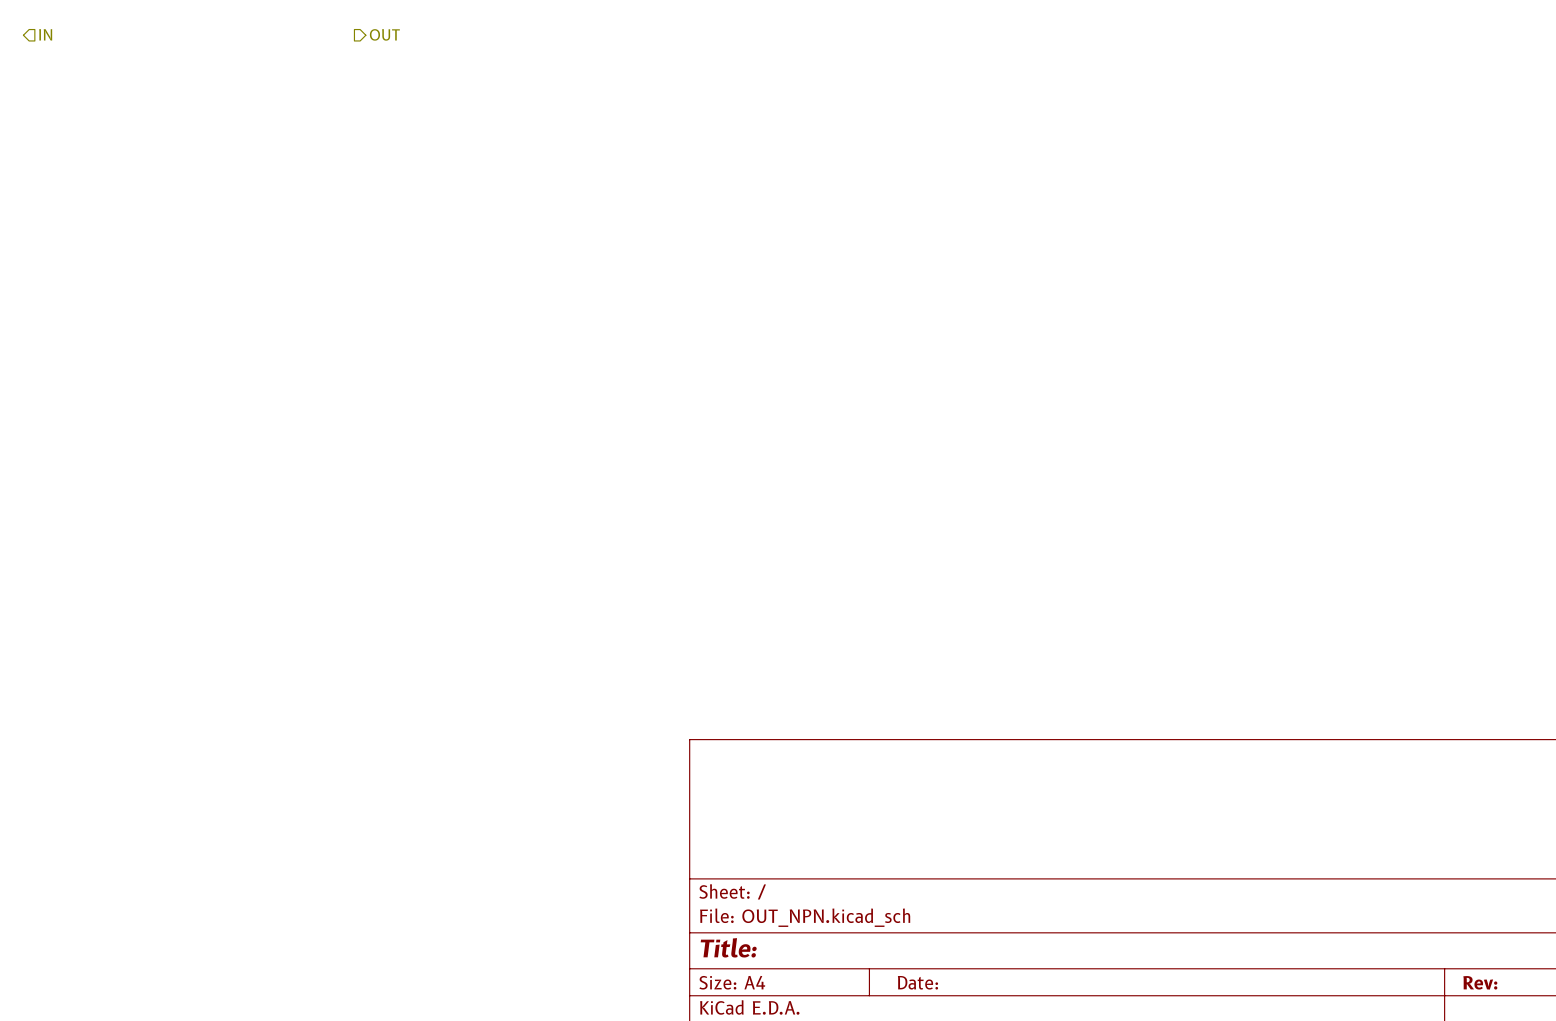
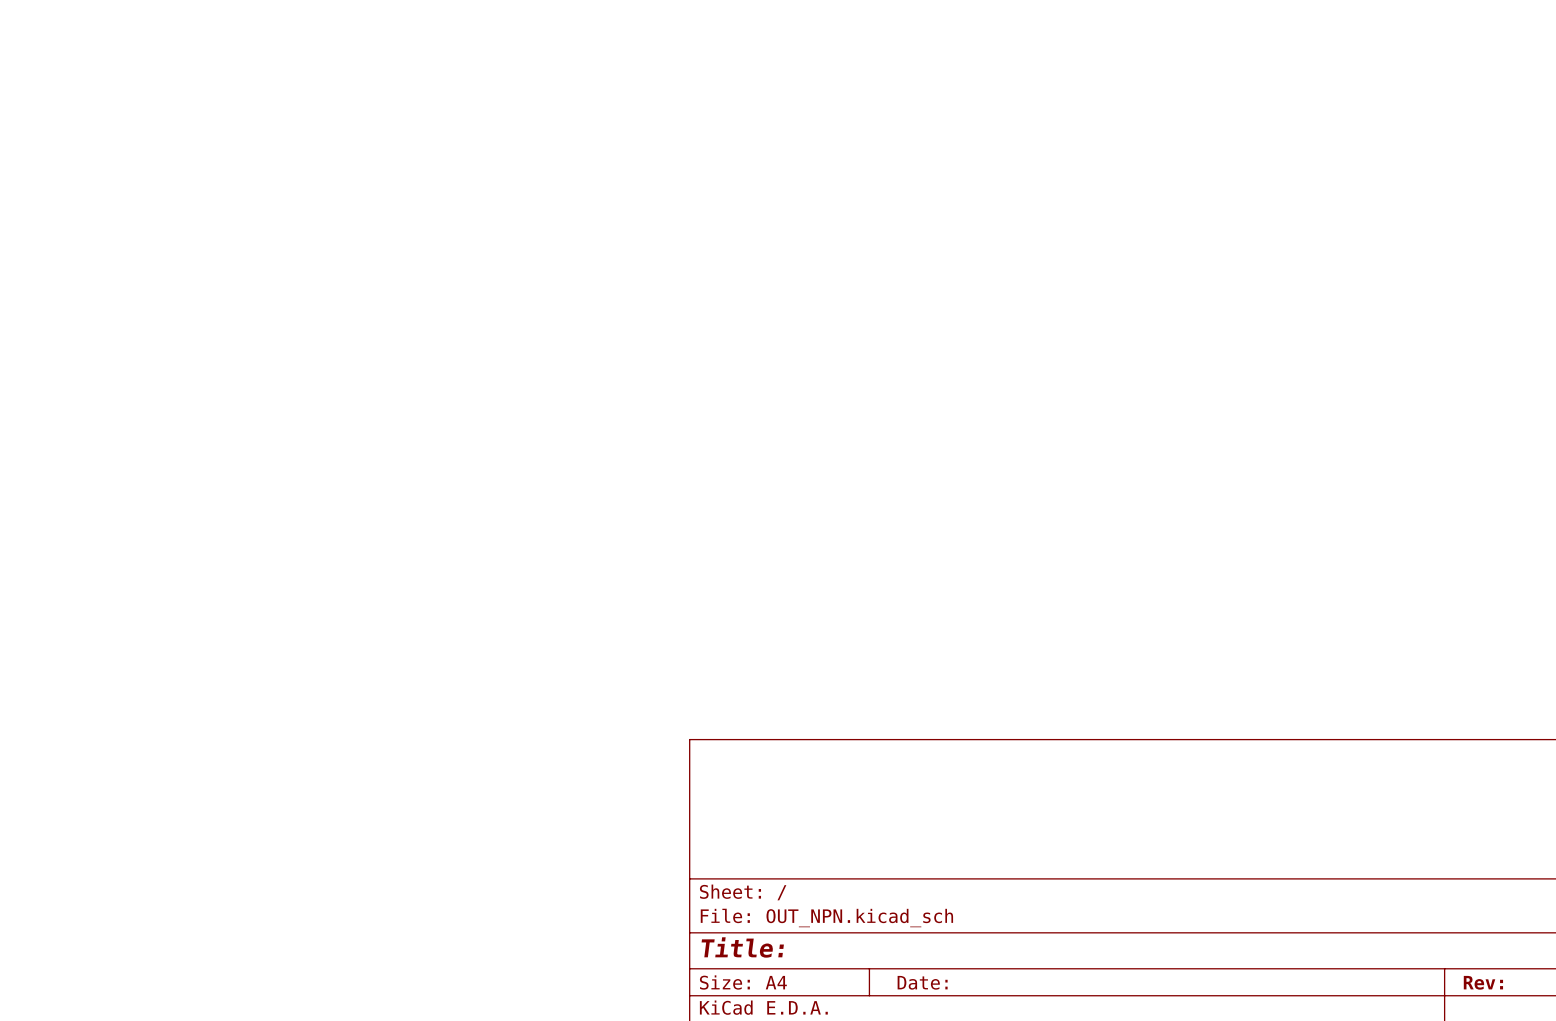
hierarchical label: IN (45, 34) -> none
hierarchical label: OUT (384, 34) -> none

